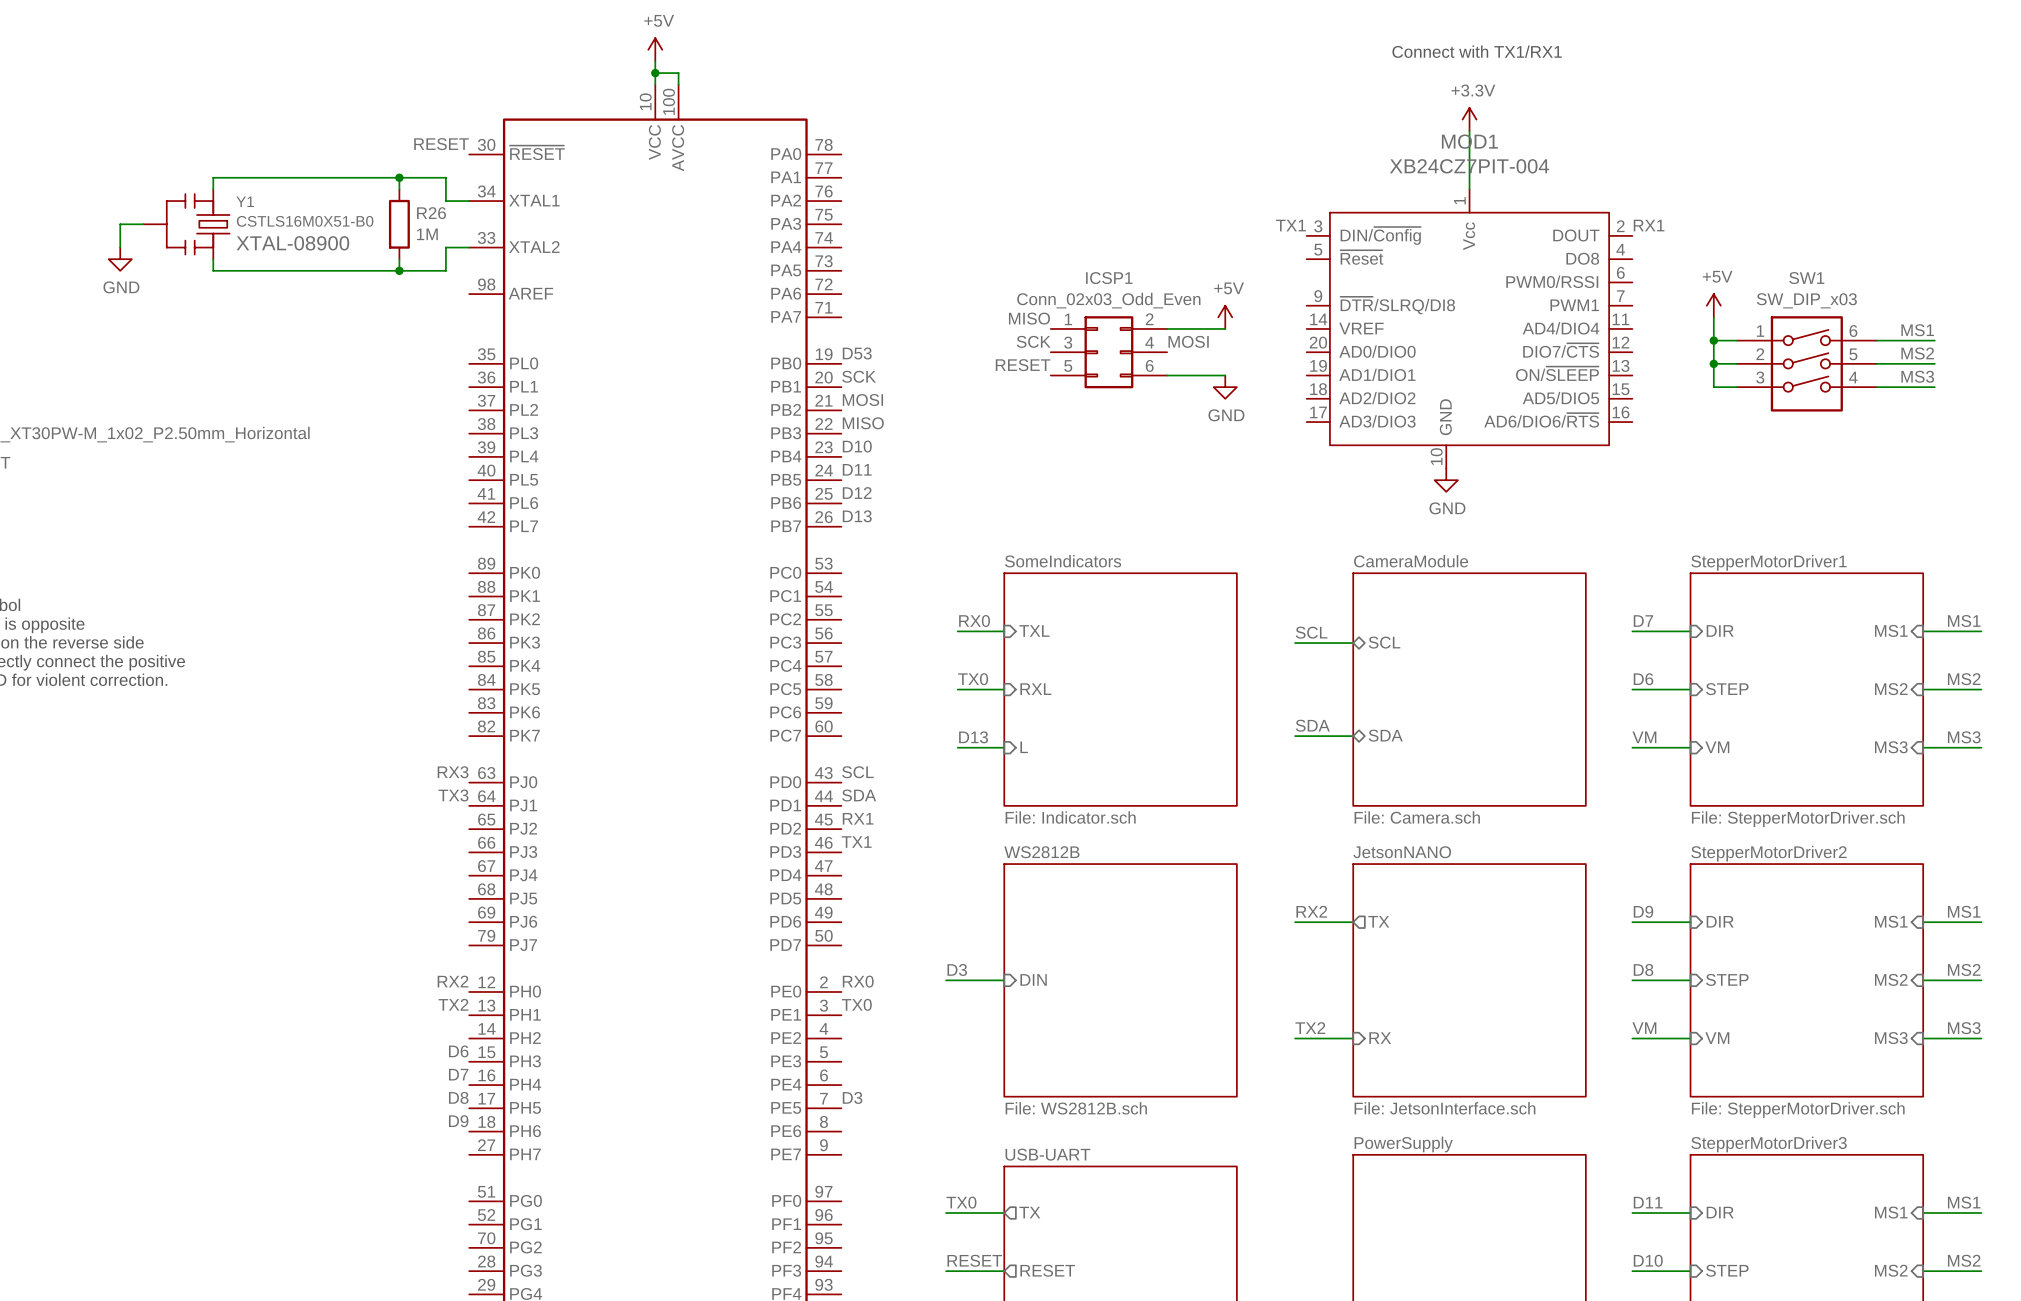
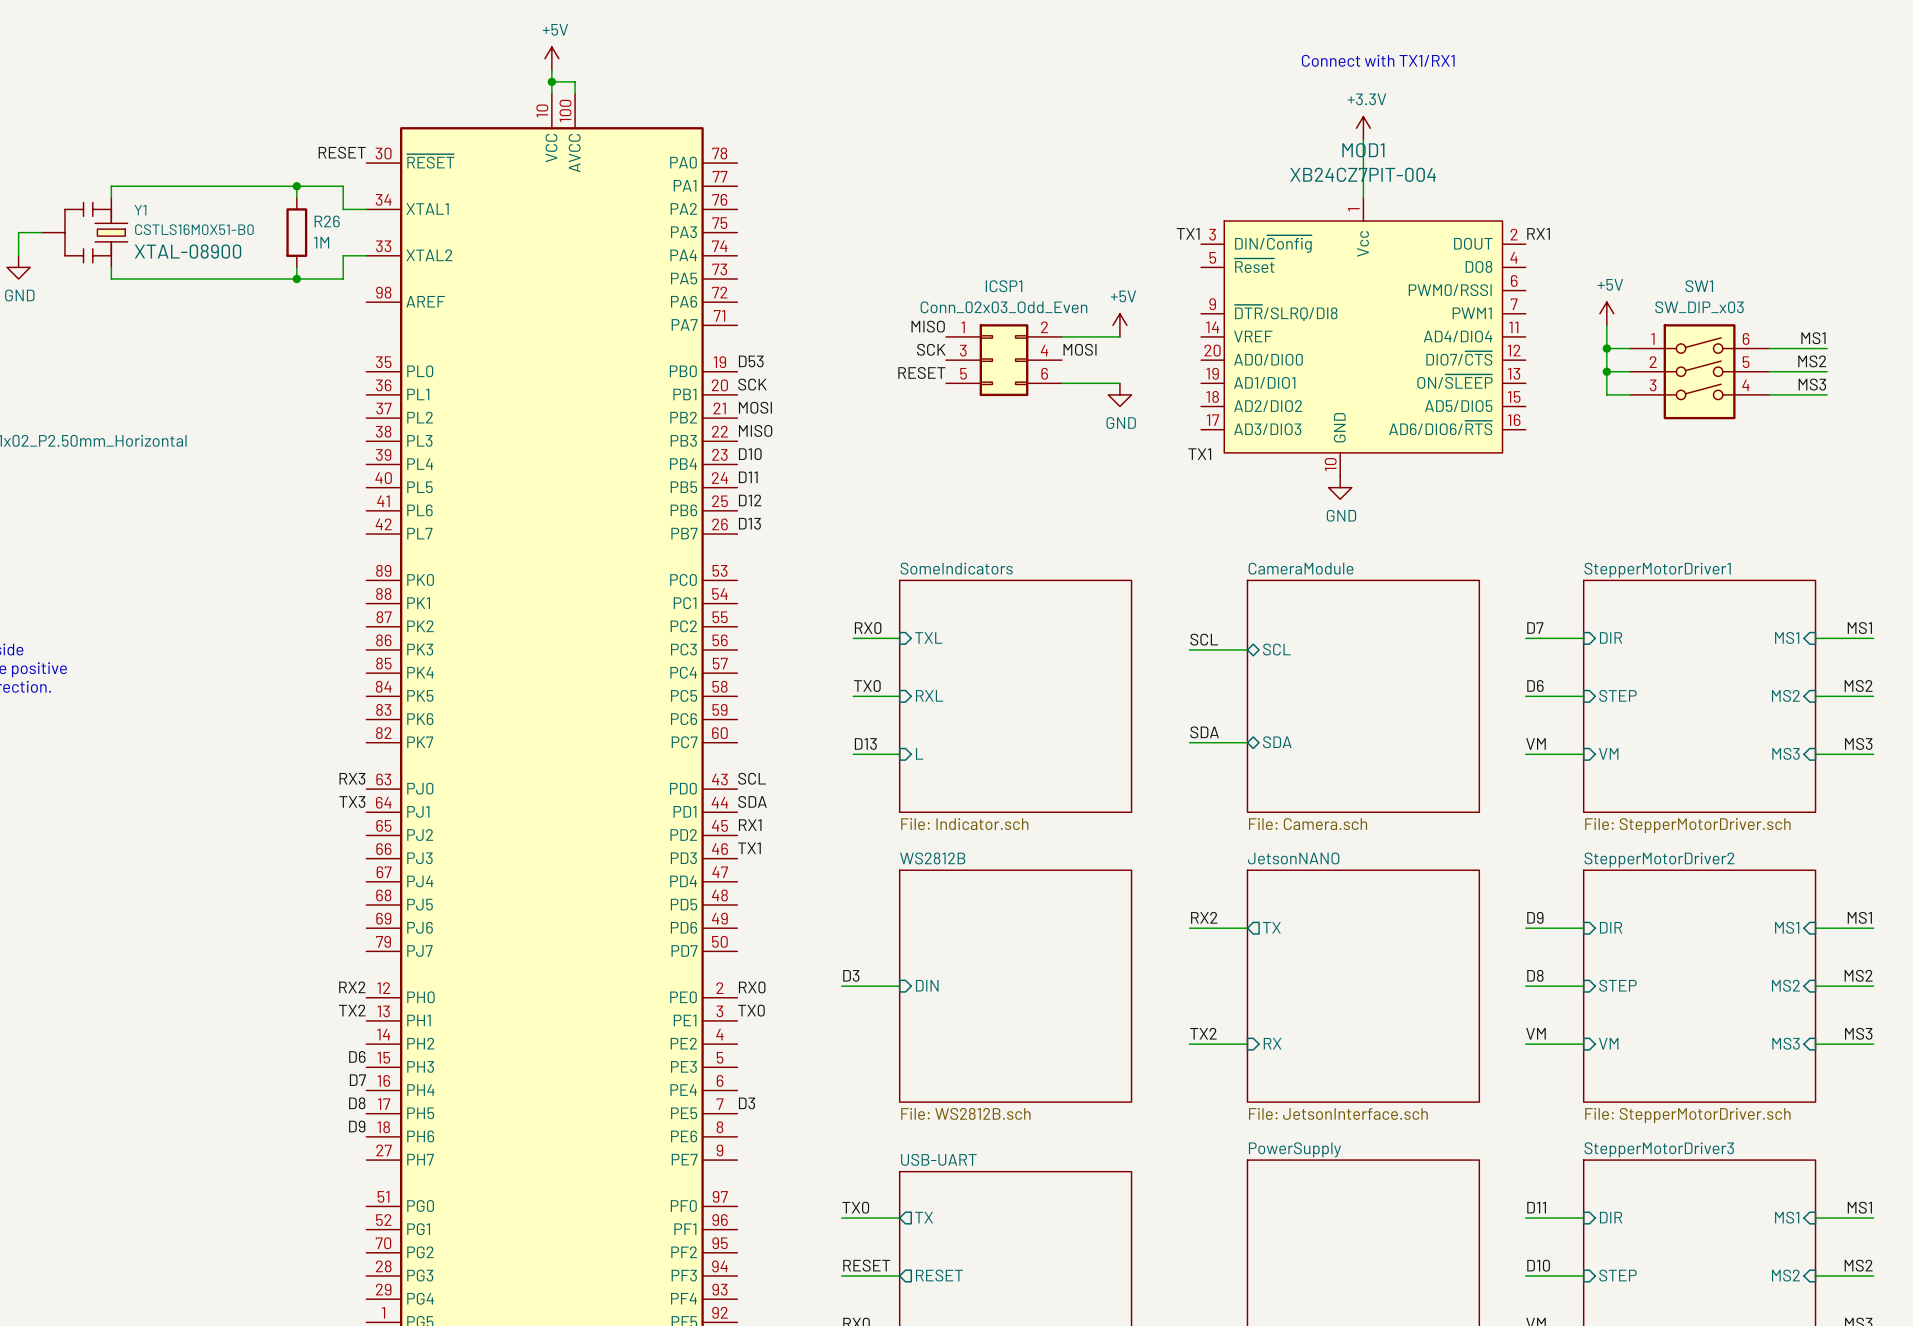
label: none -> TX1 (1199, 454)

